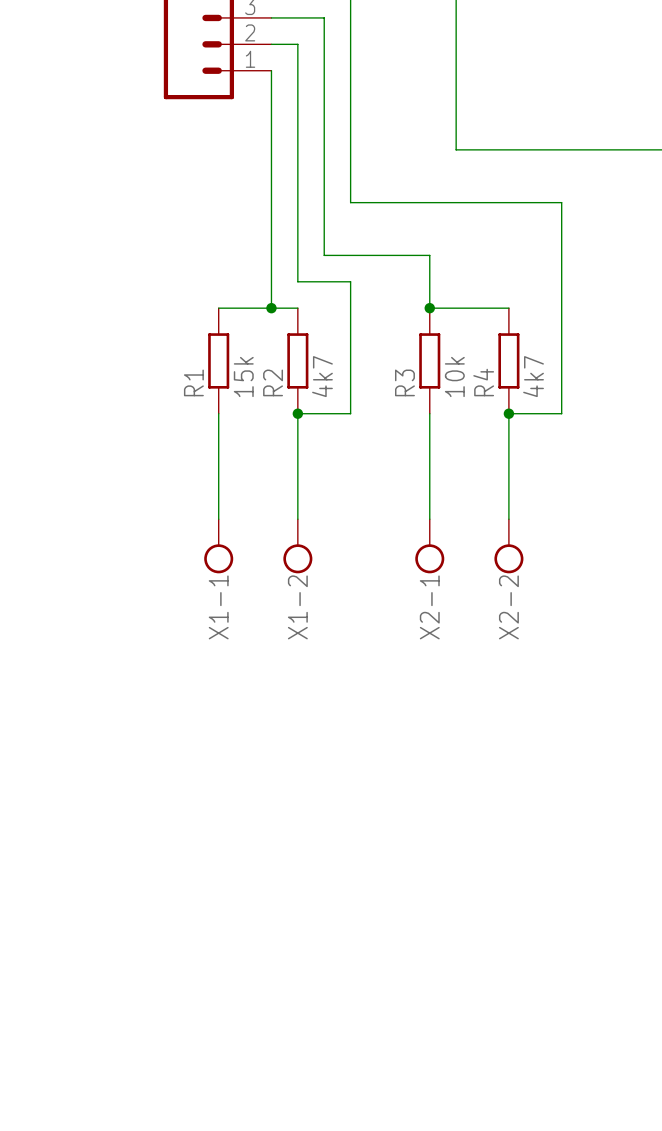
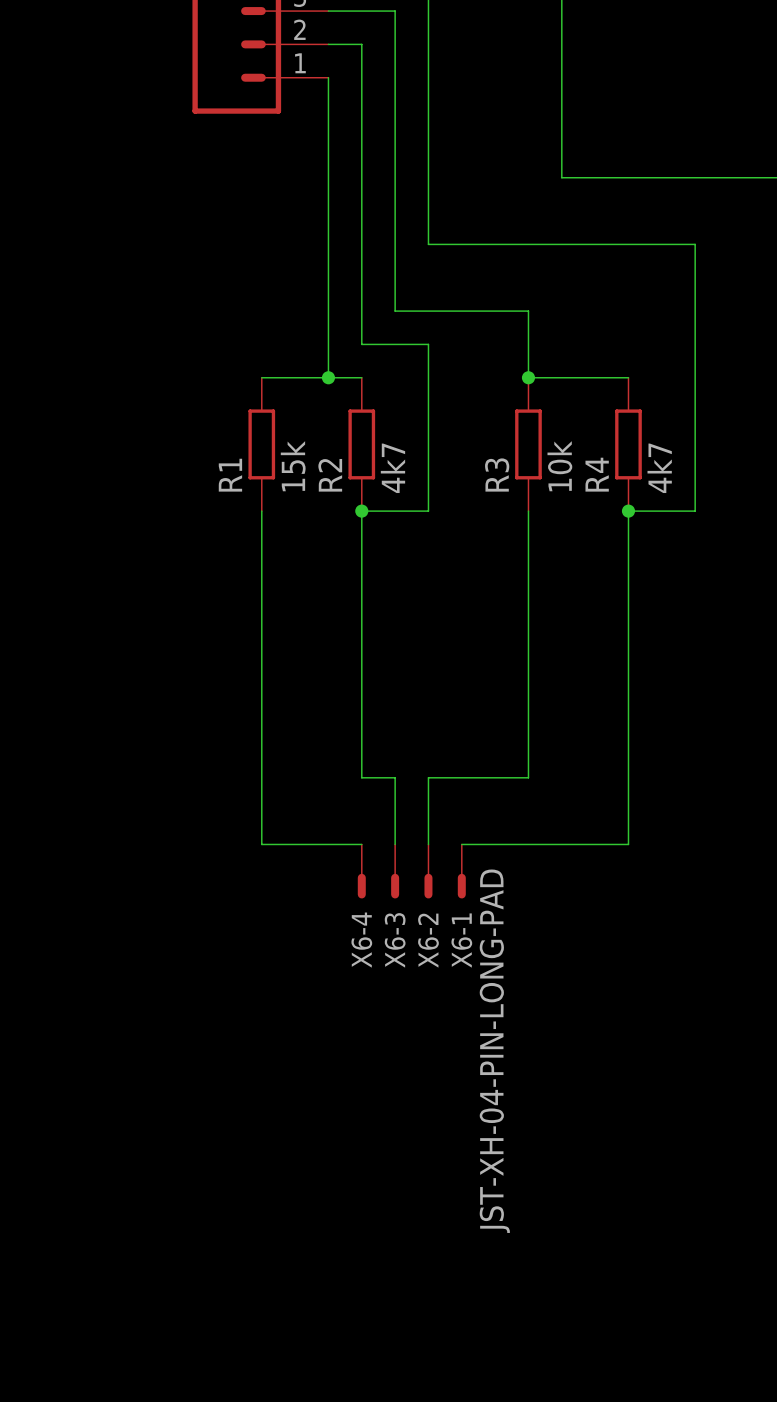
wire: none -> (261, 644) (261, 844) (361, 844)
wire: none -> (361, 644) (361, 777) (395, 777) (395, 844)
wire: none -> (528, 644) (528, 777) (428, 777) (428, 844)
wire: none -> (628, 644) (628, 844) (461, 844)
X1-1: (218, 546) -> none
X1-2: (297, 546) -> none
X2-1: (429, 546) -> none
X2-2: (508, 546) -> none
X6-4: none -> (361, 871)
X6-3: none -> (395, 871)
X6-2: none -> (428, 871)
X6-1: none -> JST-XH-04-PIN-LONG-PAD (461, 871)

